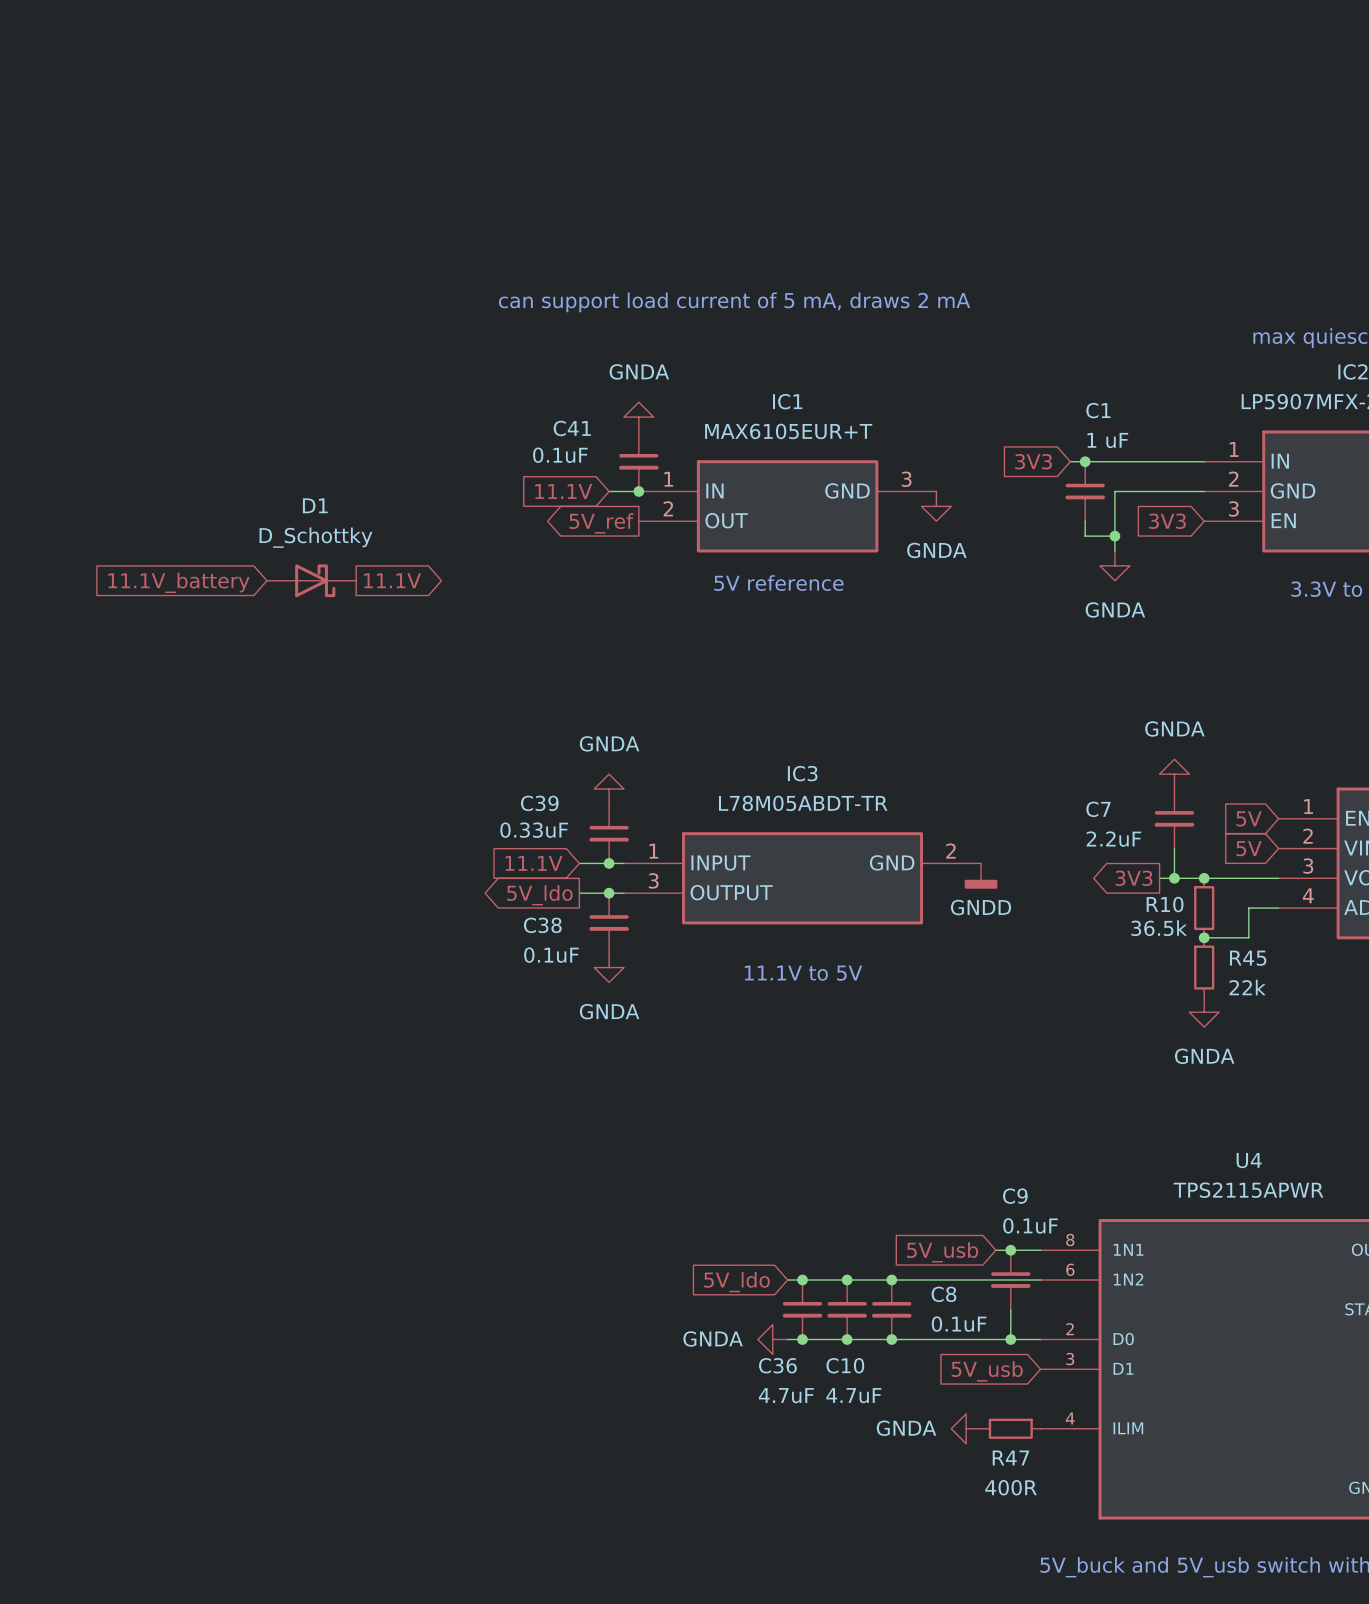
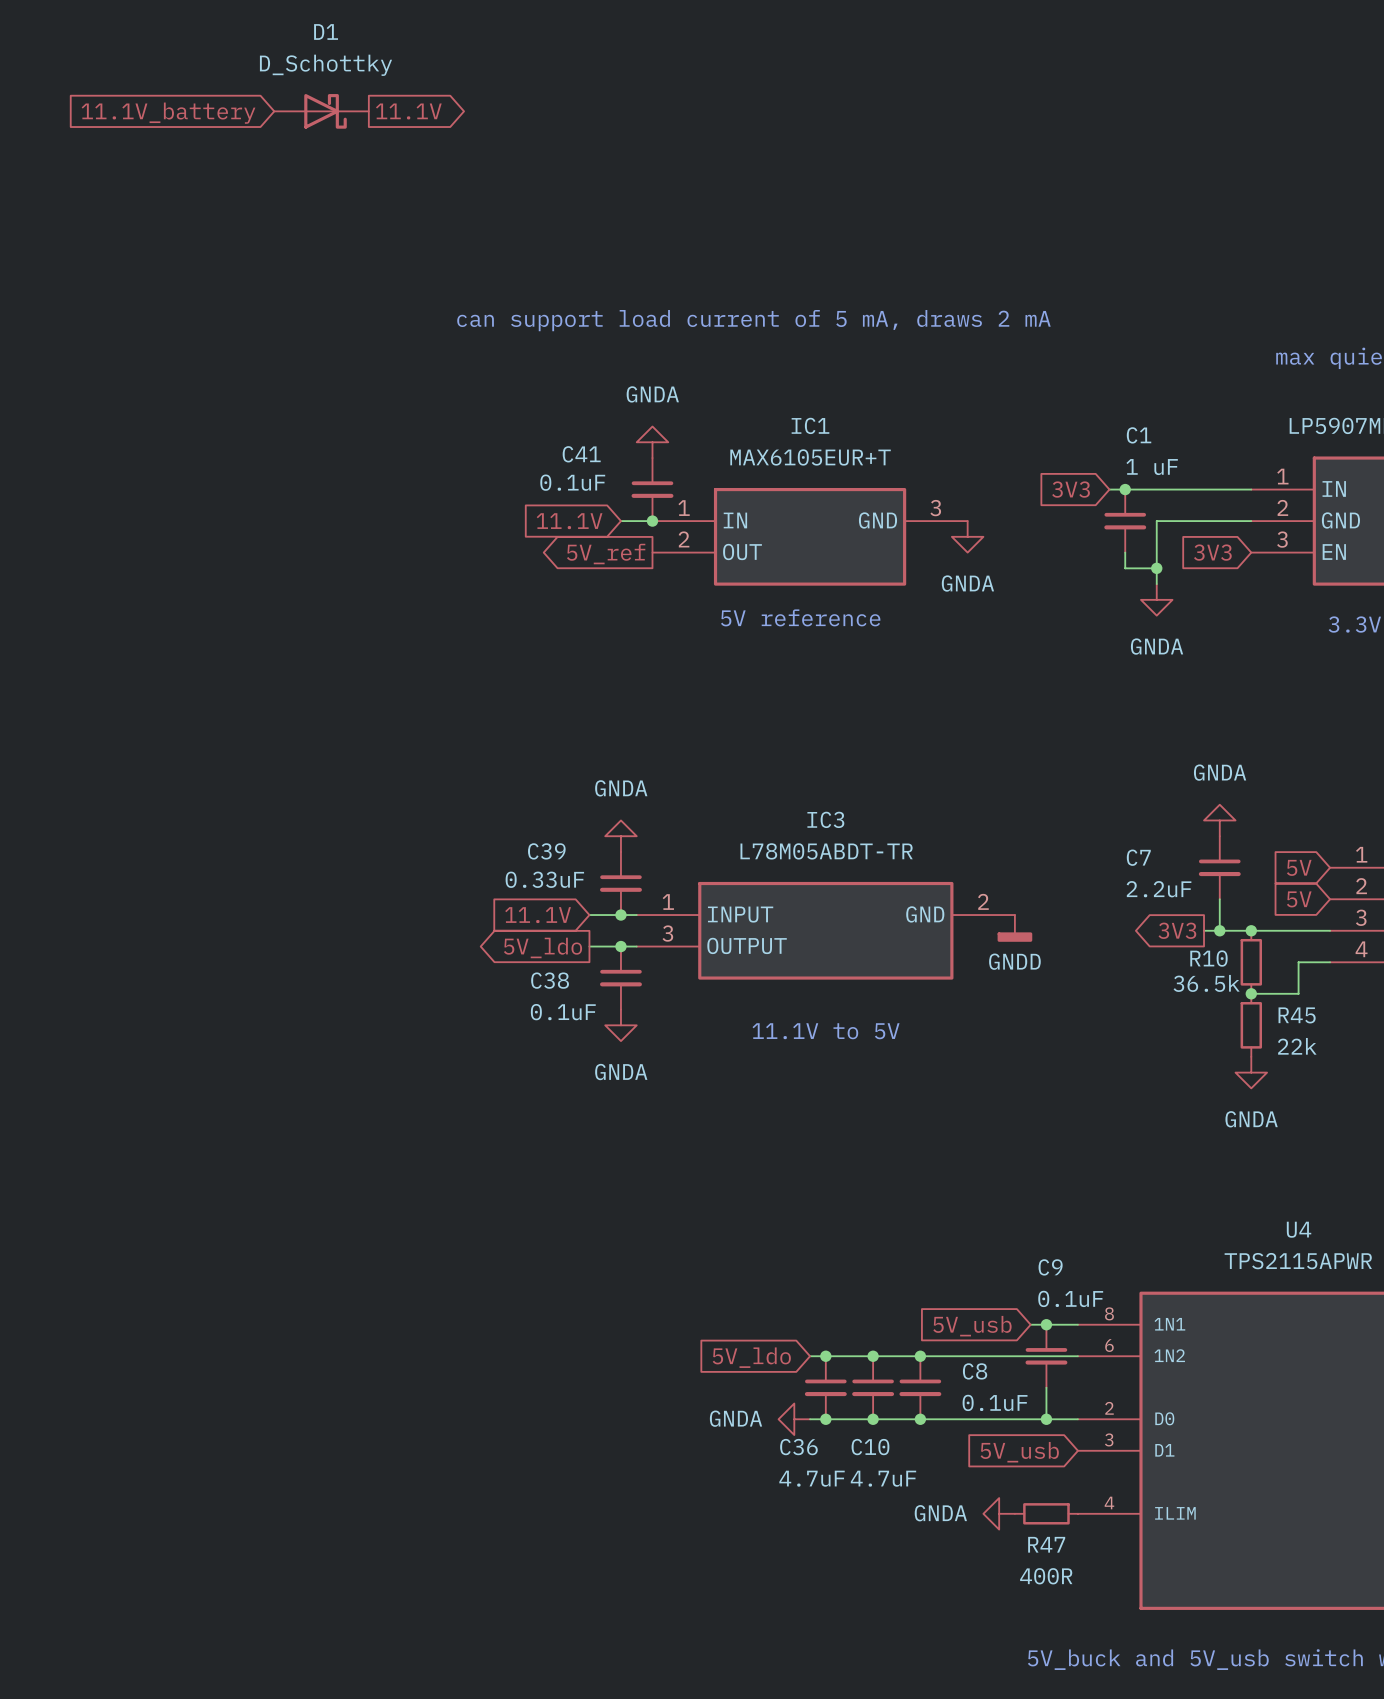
global label: none -> 11.1V (408, 111)
global label: none -> 11.1V_battery (168, 113)
D1 position: (311, 580) -> (321, 111)
global label: 11.1V (392, 580) -> none
global label: 11.1V_battery (178, 582) -> none

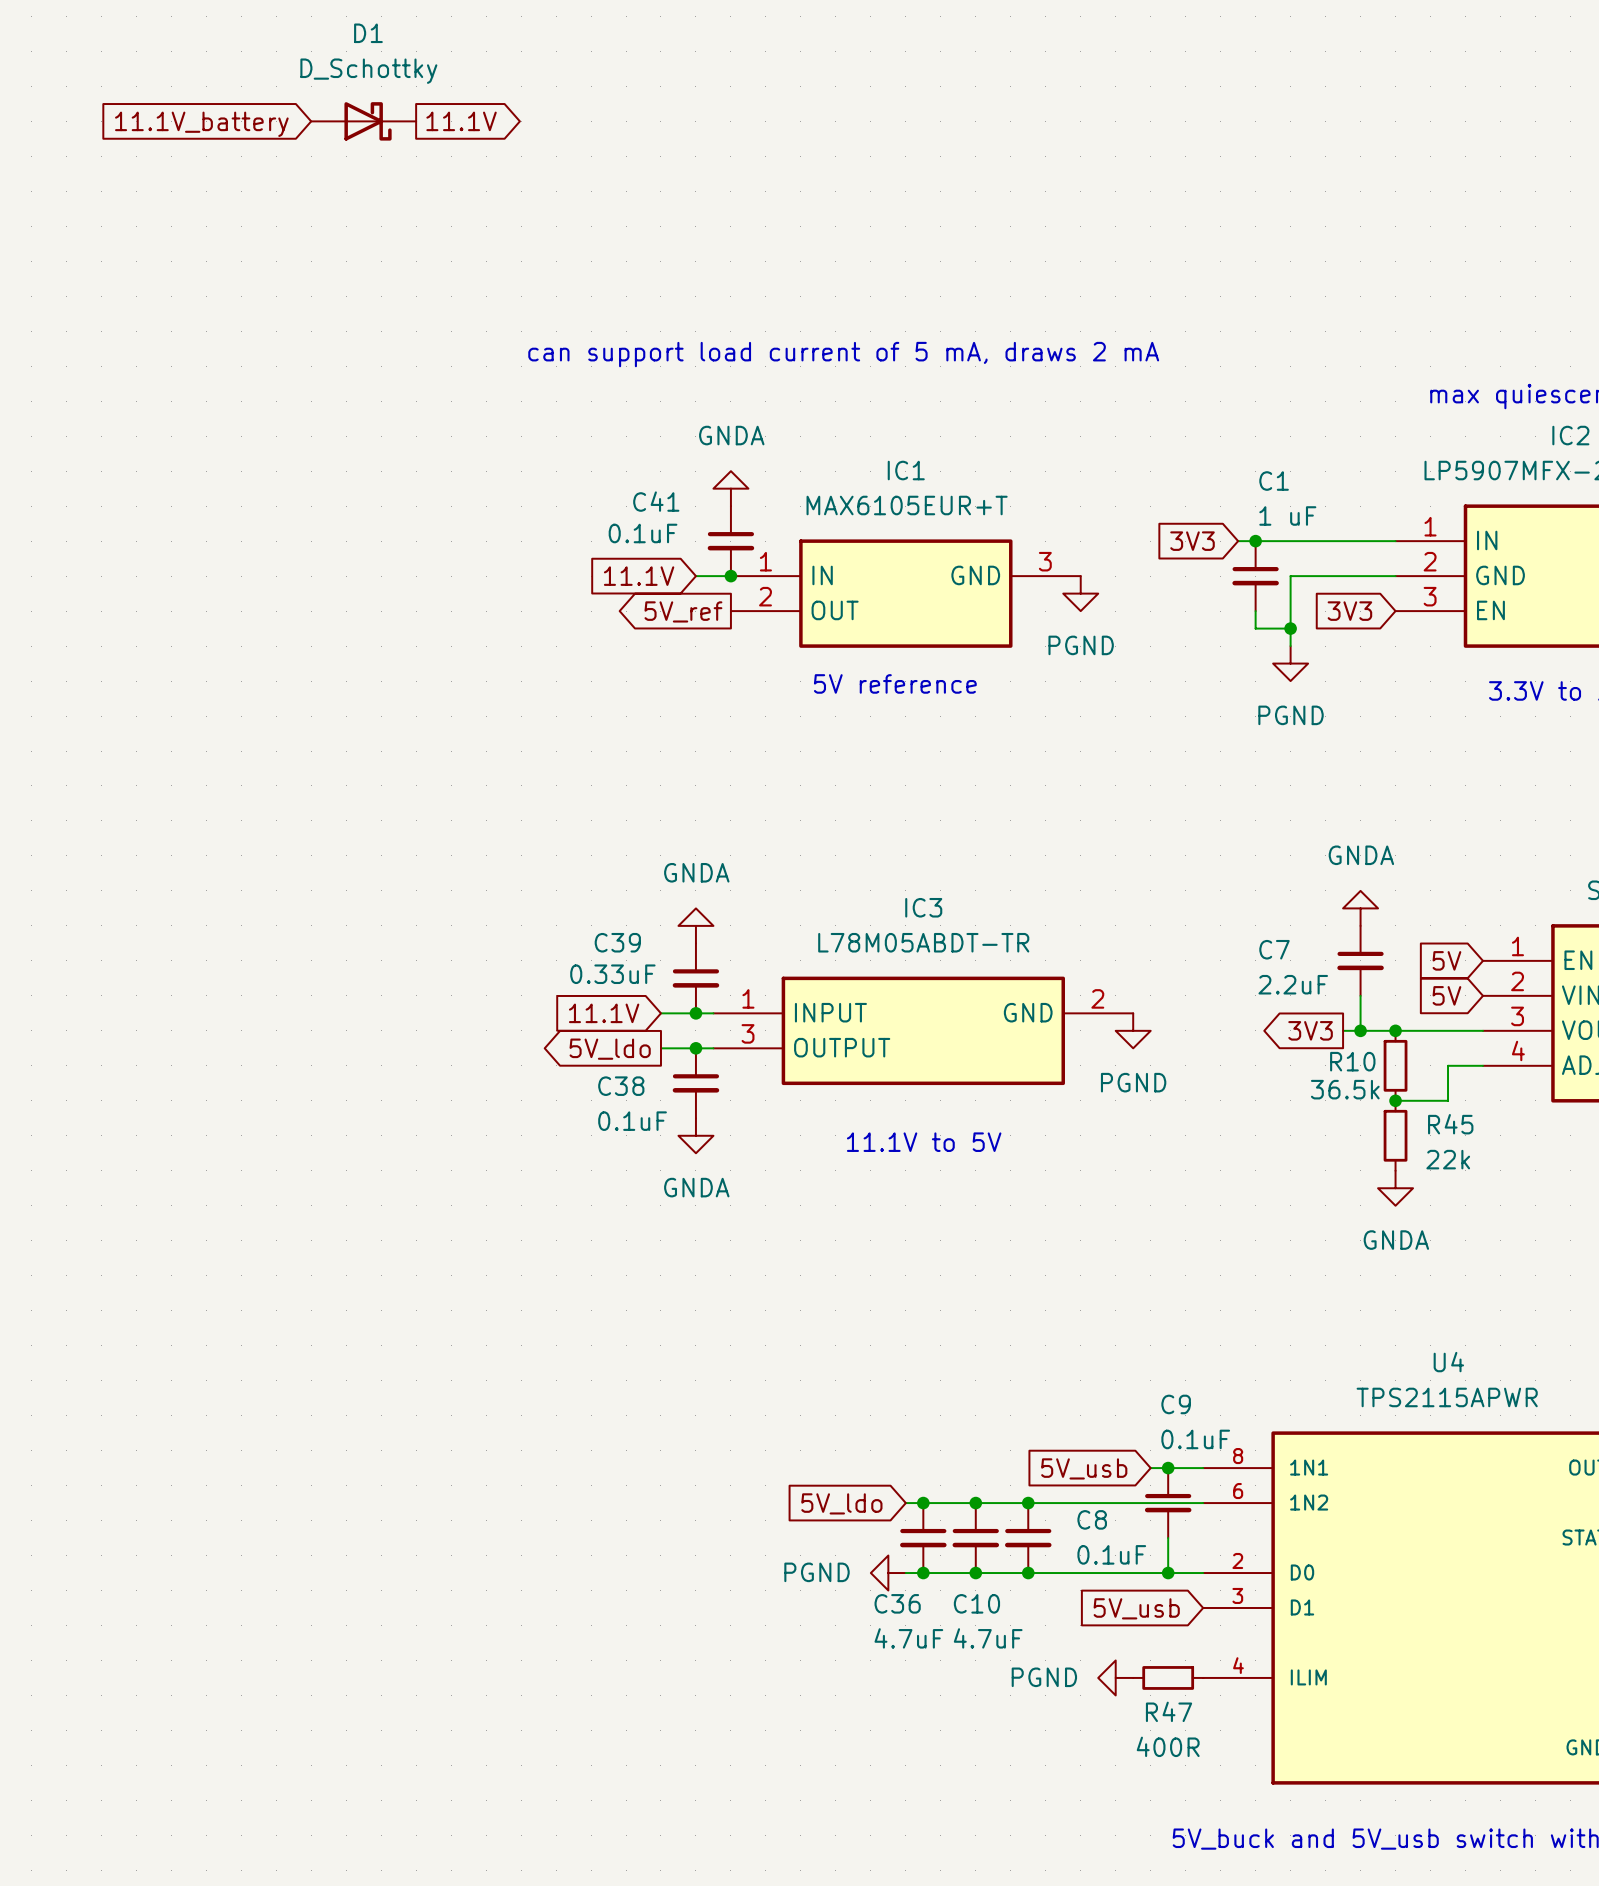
power symbol: GNDA (967, 536) -> PGND (1080, 593)
power symbol: GNDA (1156, 599) -> PGND (1290, 663)
power symbol: GNDD (1014, 928) -> PGND (1133, 1030)
power symbol: GNDA (794, 1419) -> PGND (888, 1573)
power symbol: GNDA (999, 1513) -> PGND (1115, 1677)

